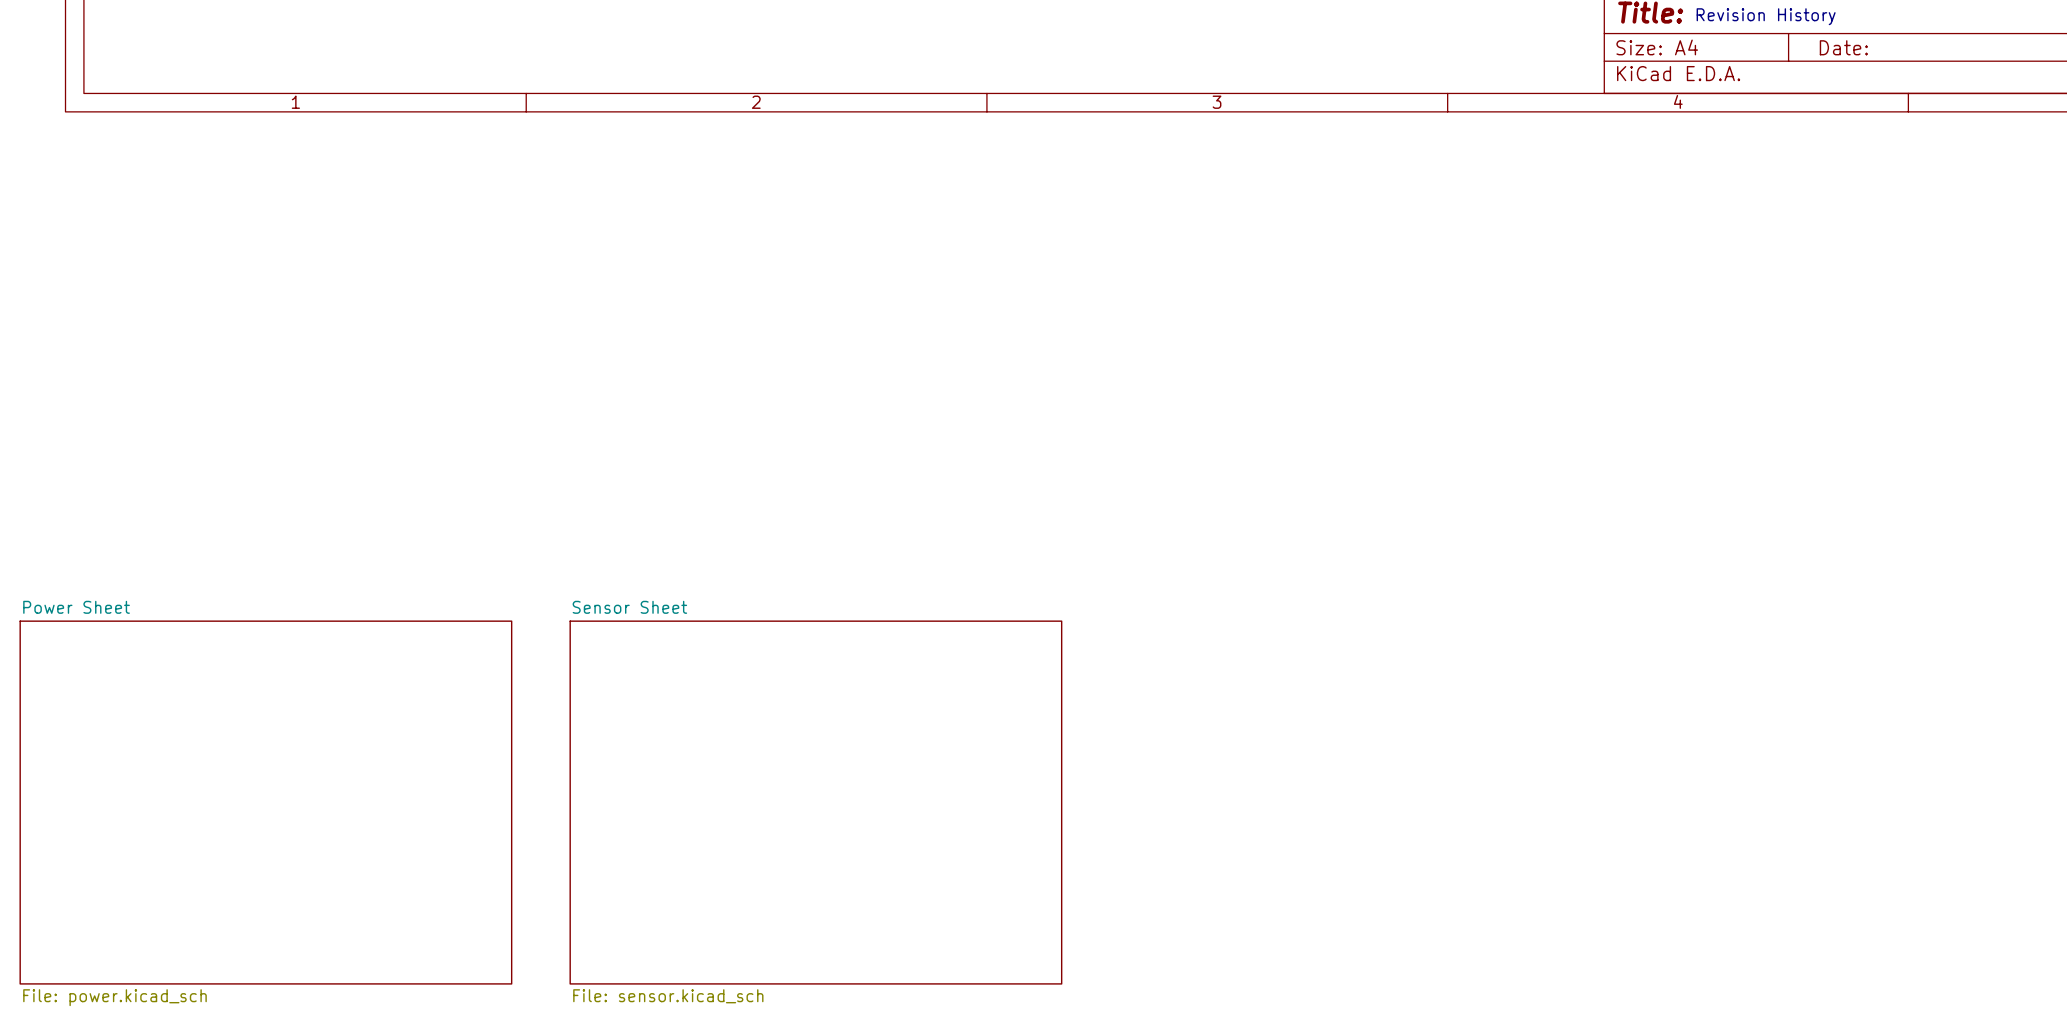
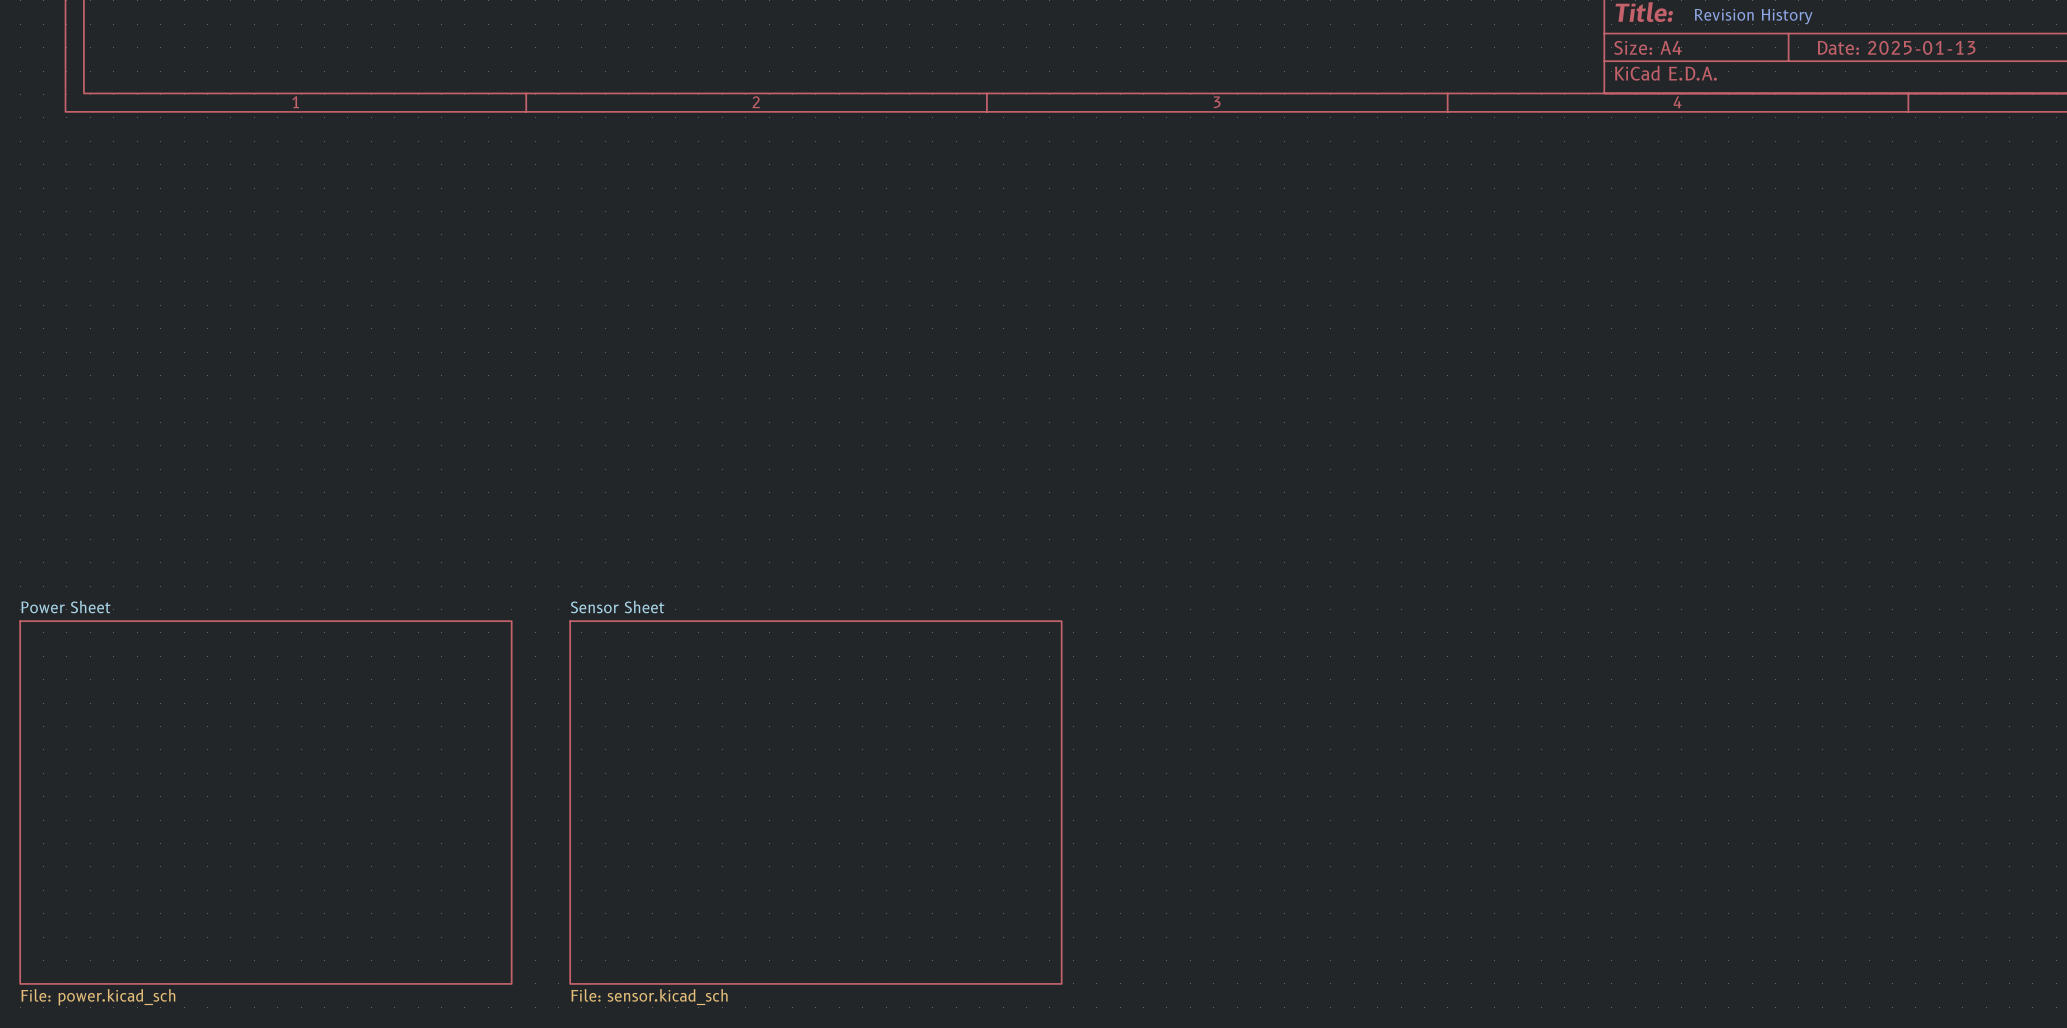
title block: Date: (1843, 47) -> Date: 2025-01-13 (1896, 47)

